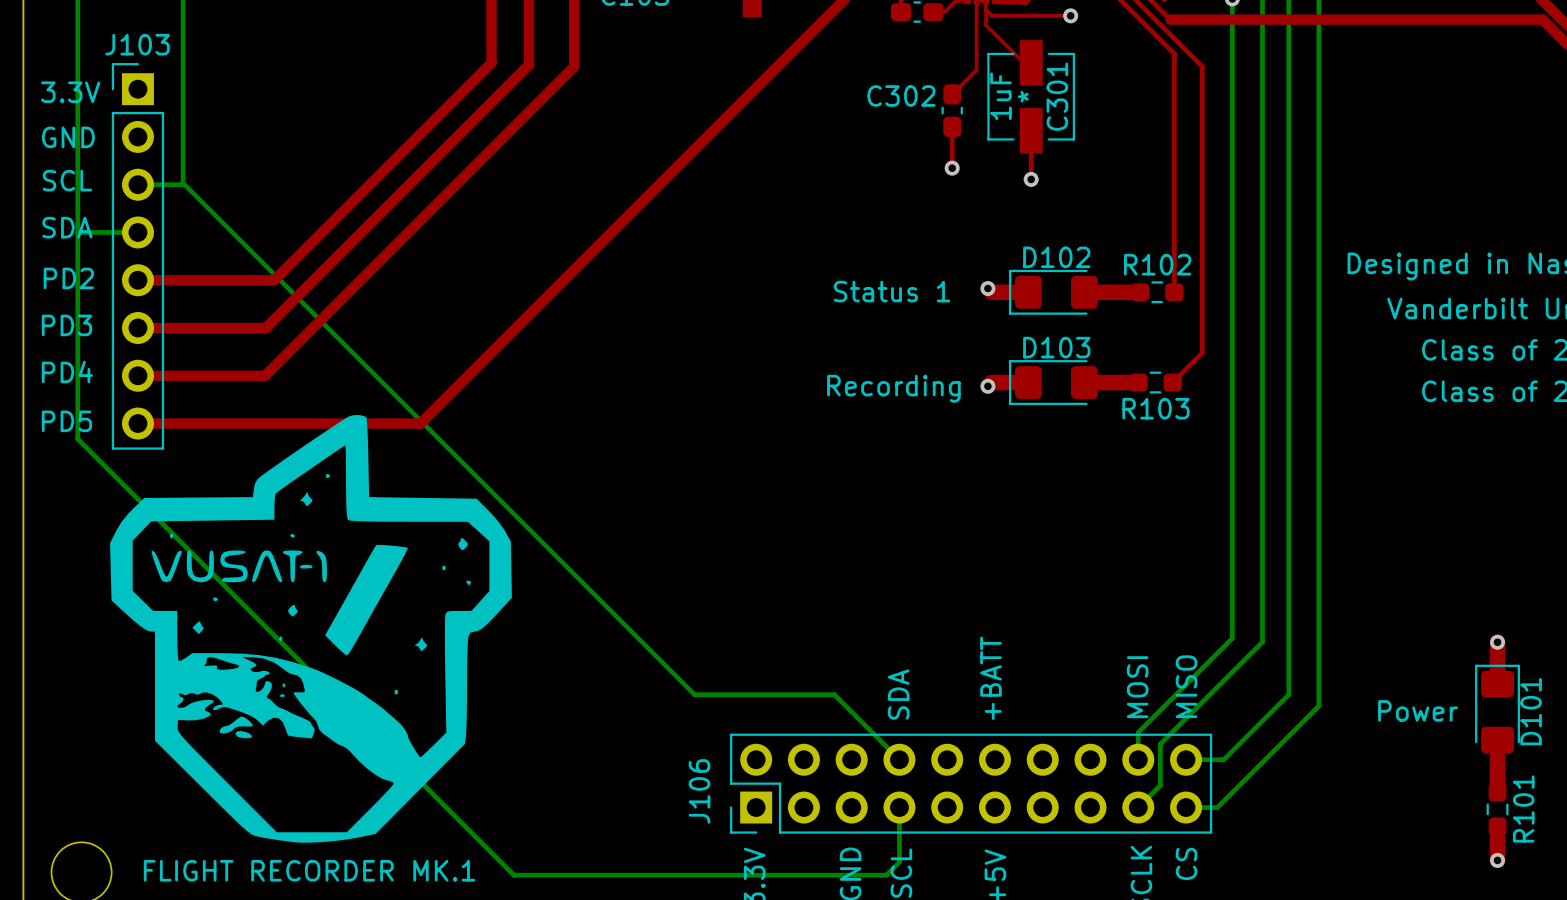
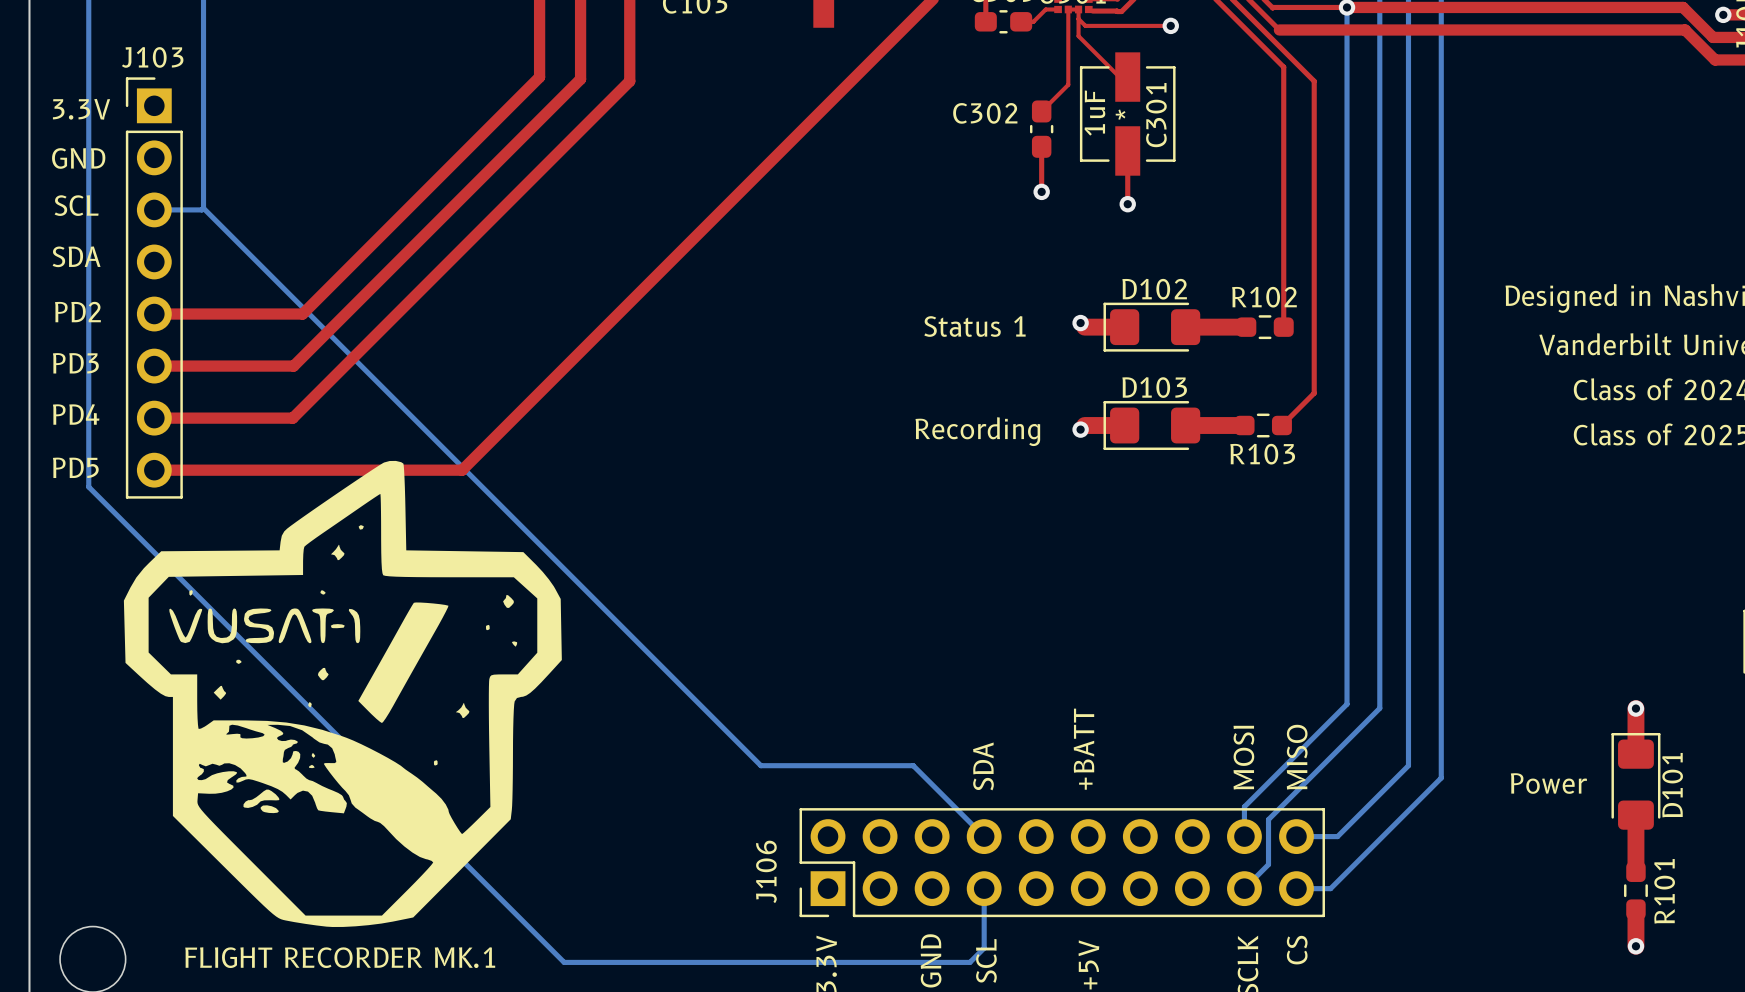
bottom track: (77, 232) (137, 232) -> none

